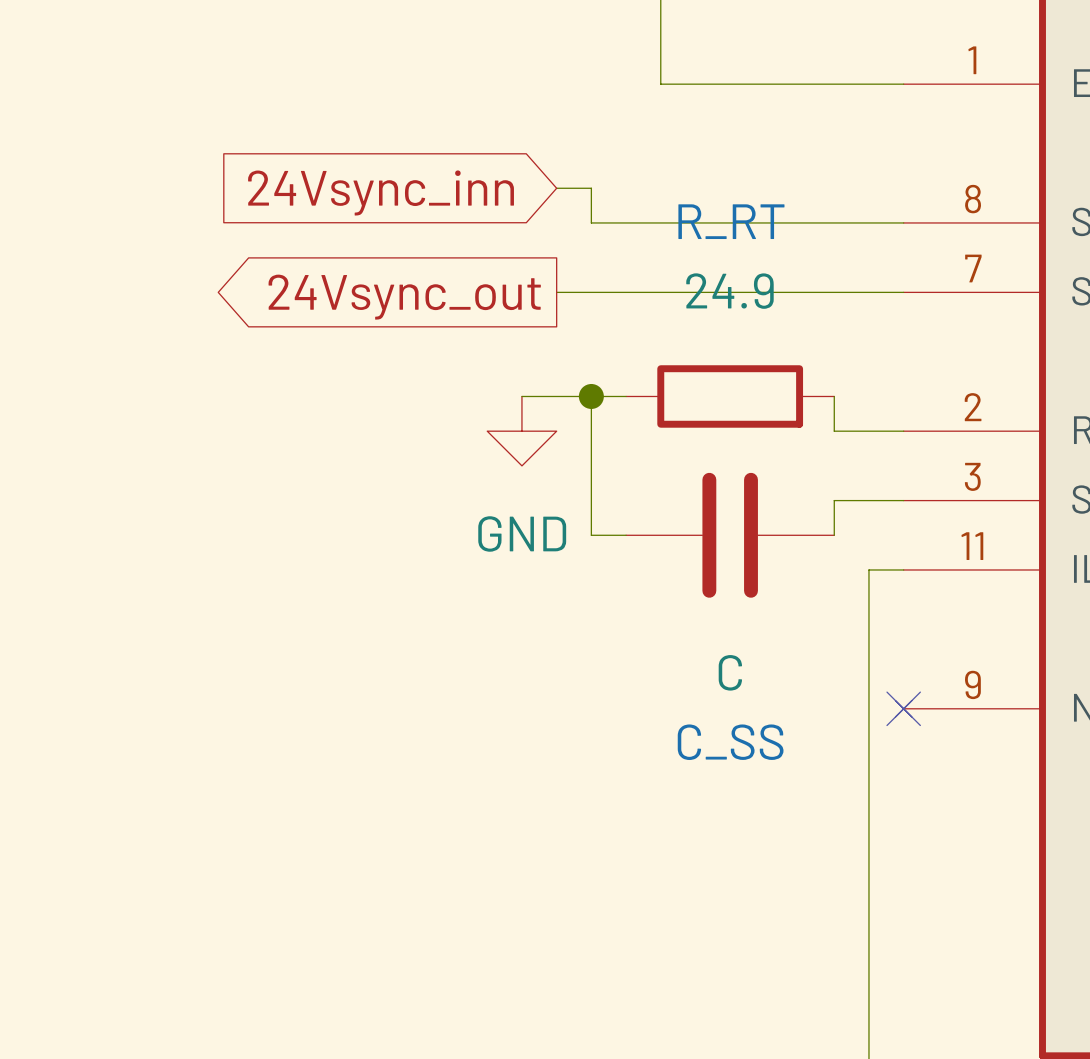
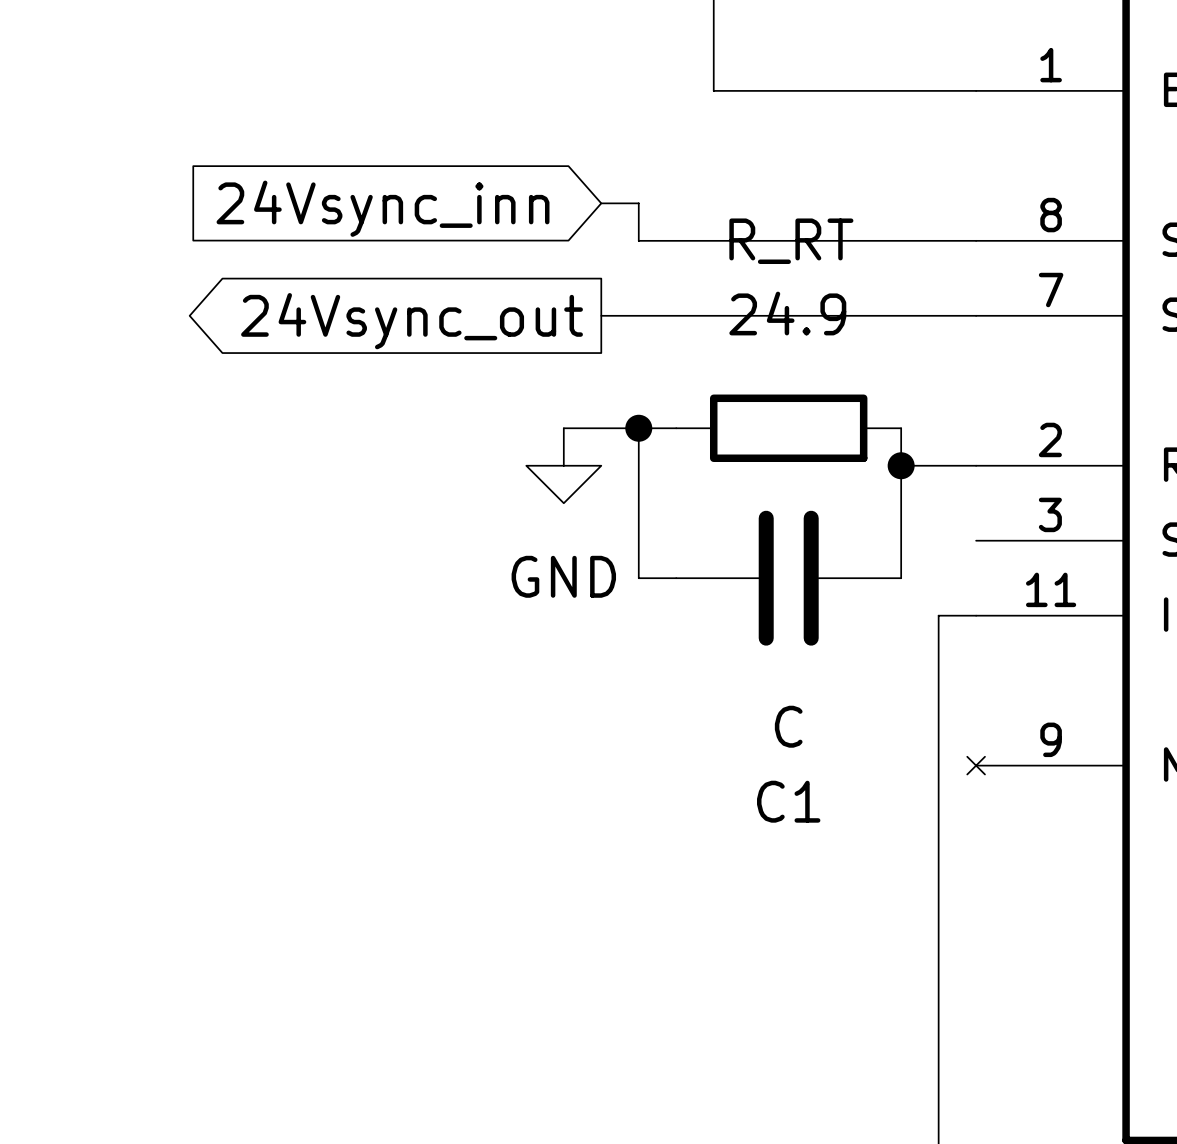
junction: none -> (901, 465)
wire: (834, 500) (903, 500) -> (901, 540) (901, 465)
no-connect mark: (903, 708) -> none
C_SS name: C_SS (730, 742) -> C1 (788, 801)

